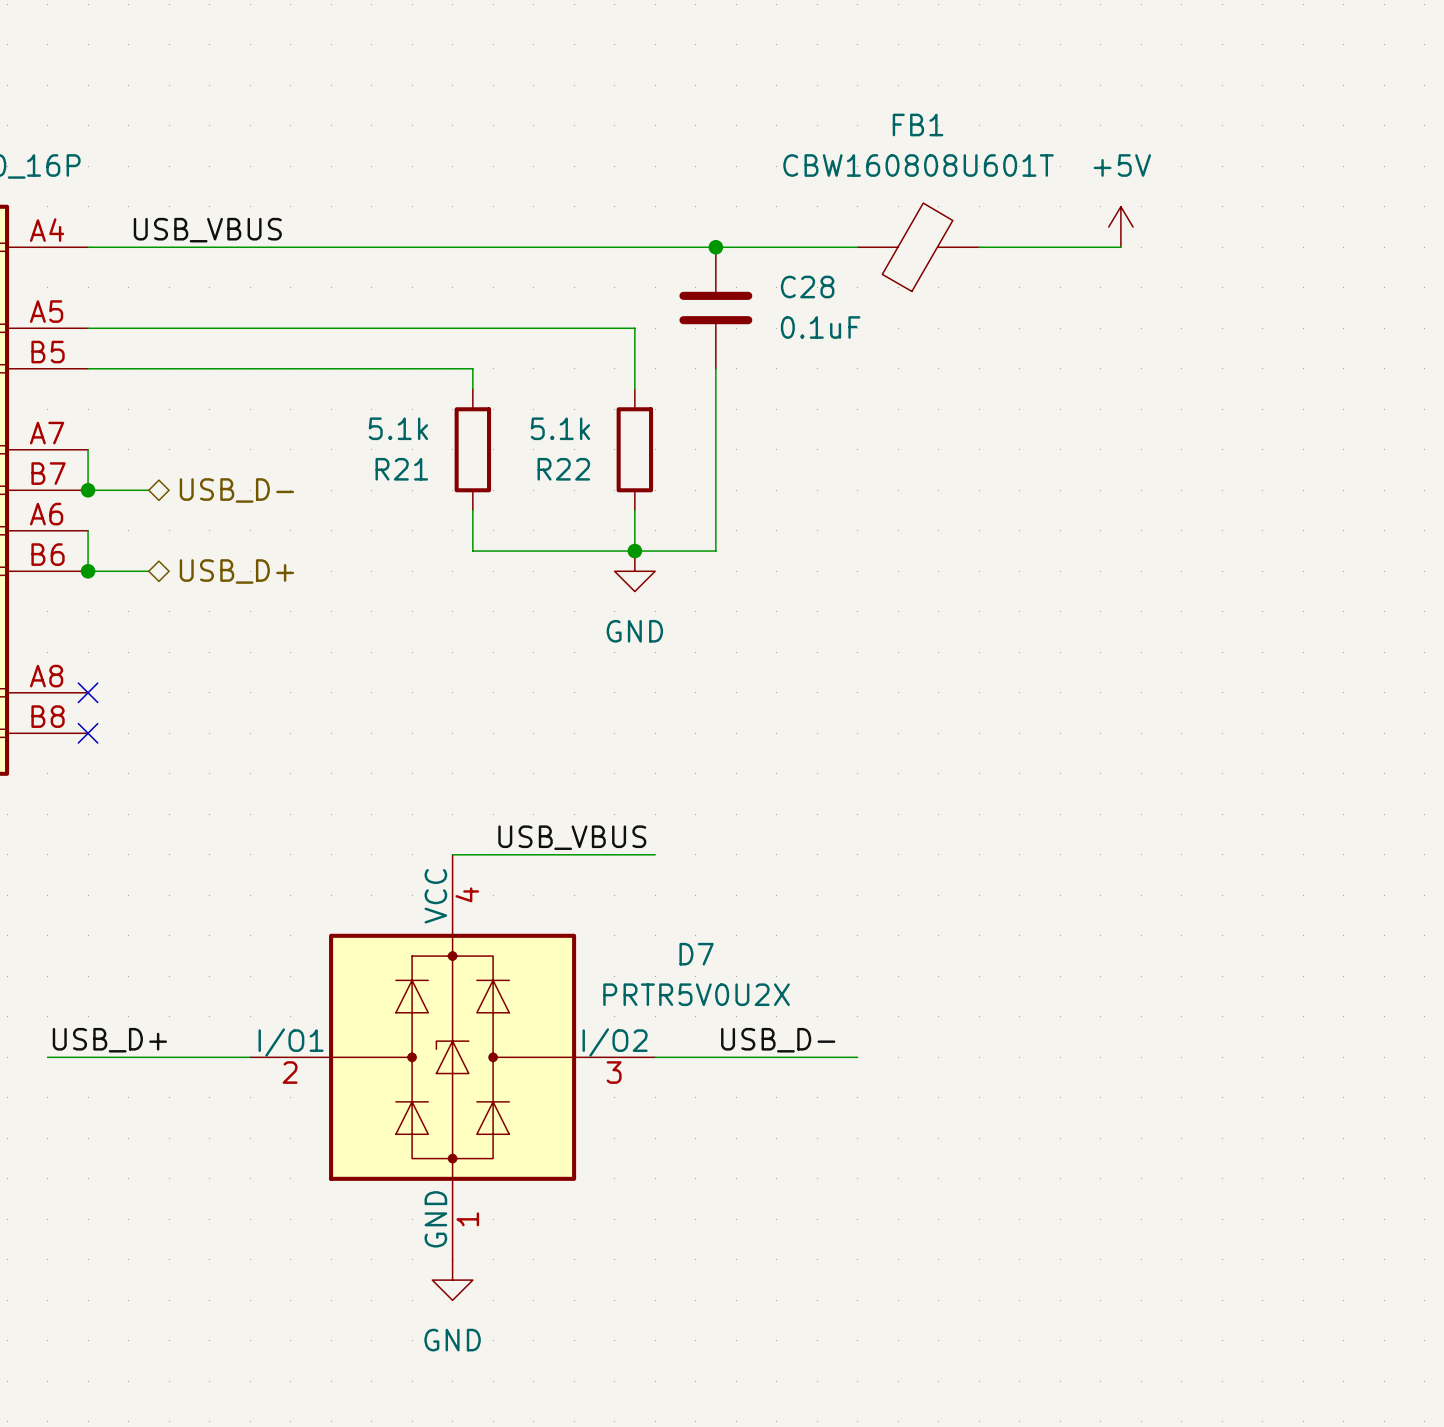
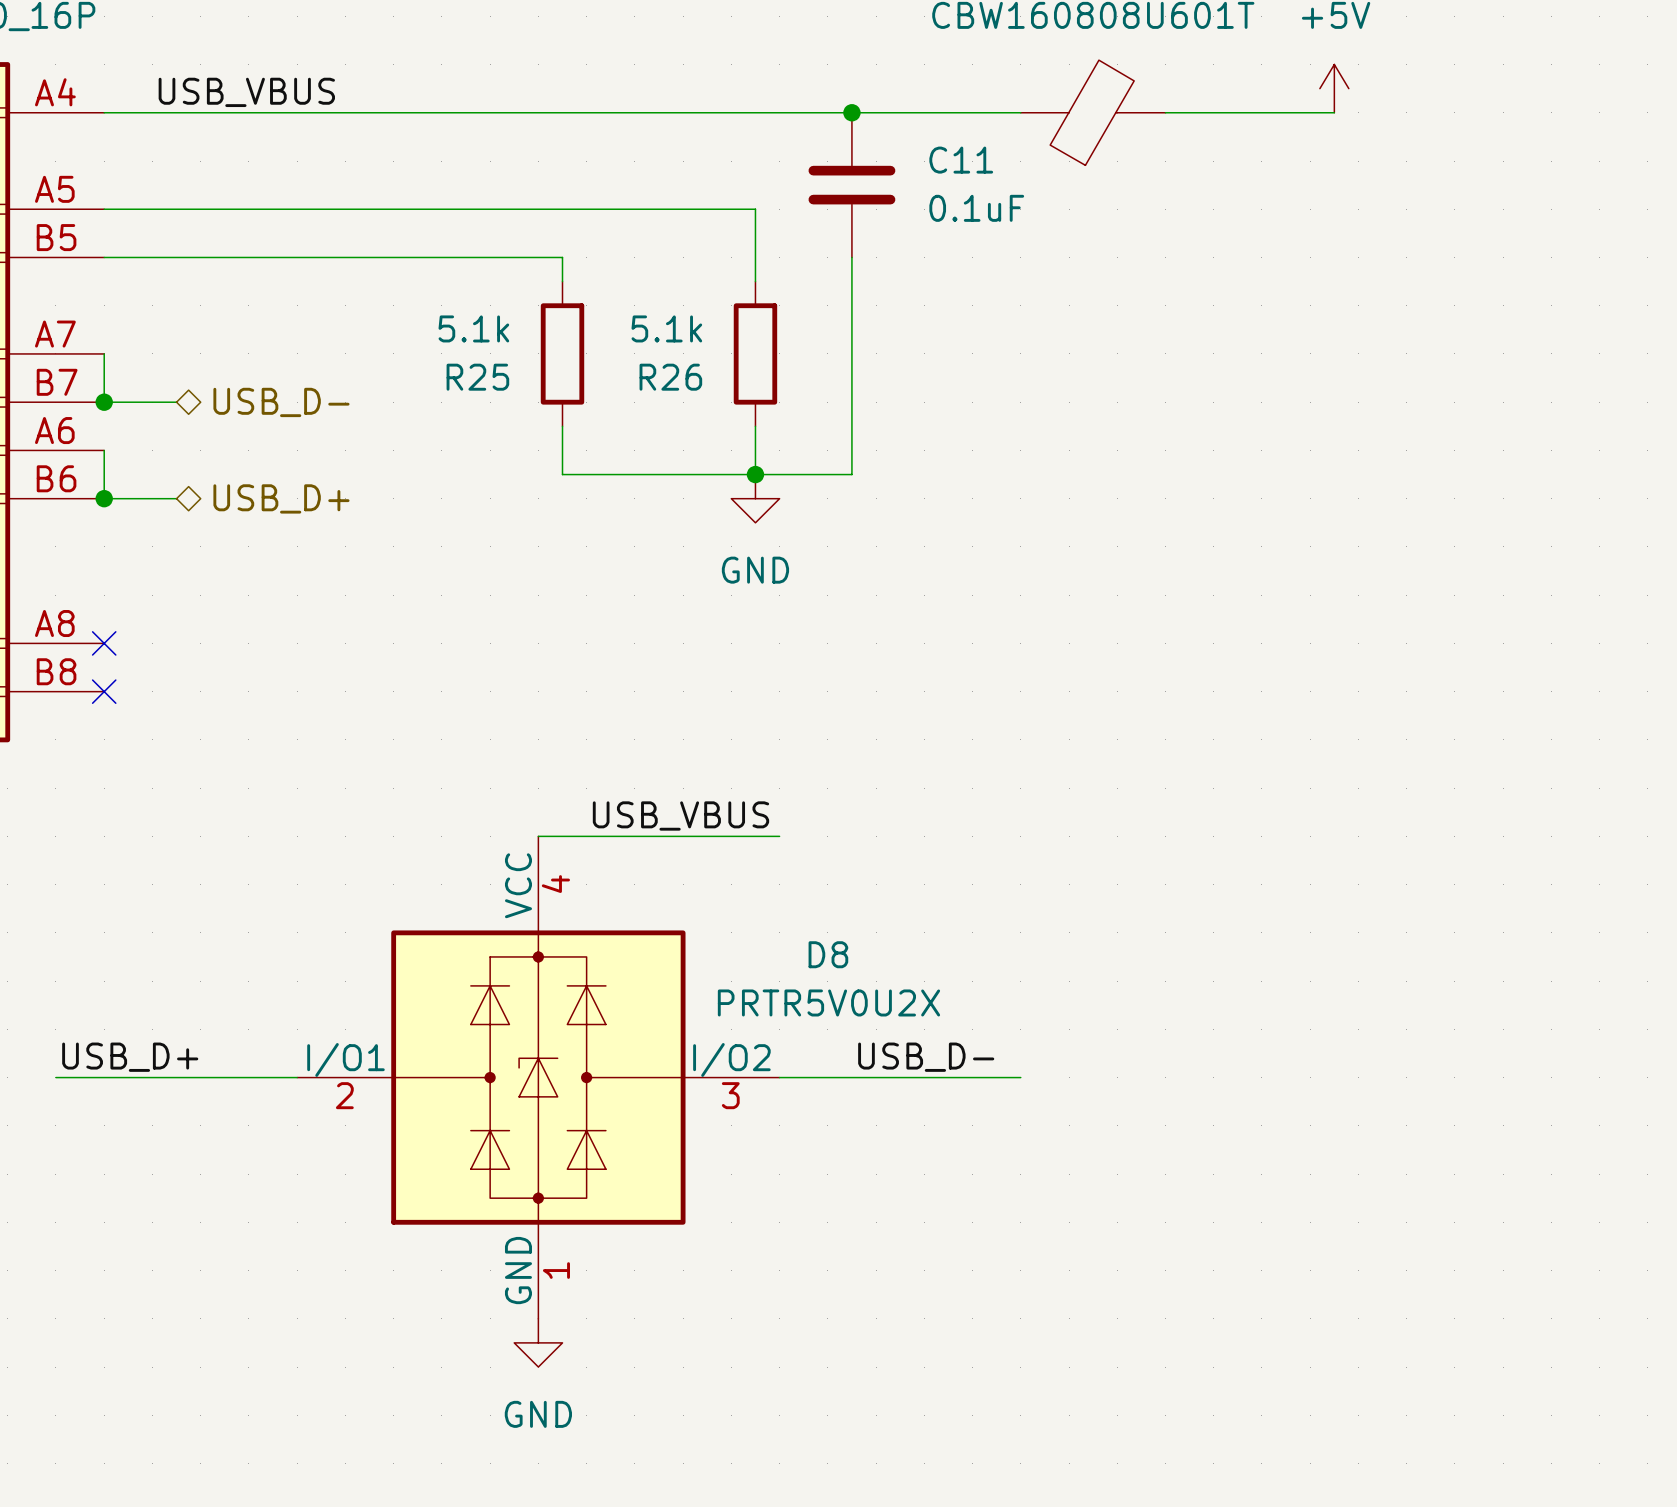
C28 name: C28 (807, 287) -> C11 (961, 160)
R21 name: R21 (401, 469) -> R25 (477, 377)
R22 name: R22 (563, 469) -> R26 (670, 377)
D7 name: D7 (696, 954) -> D8 (828, 954)

